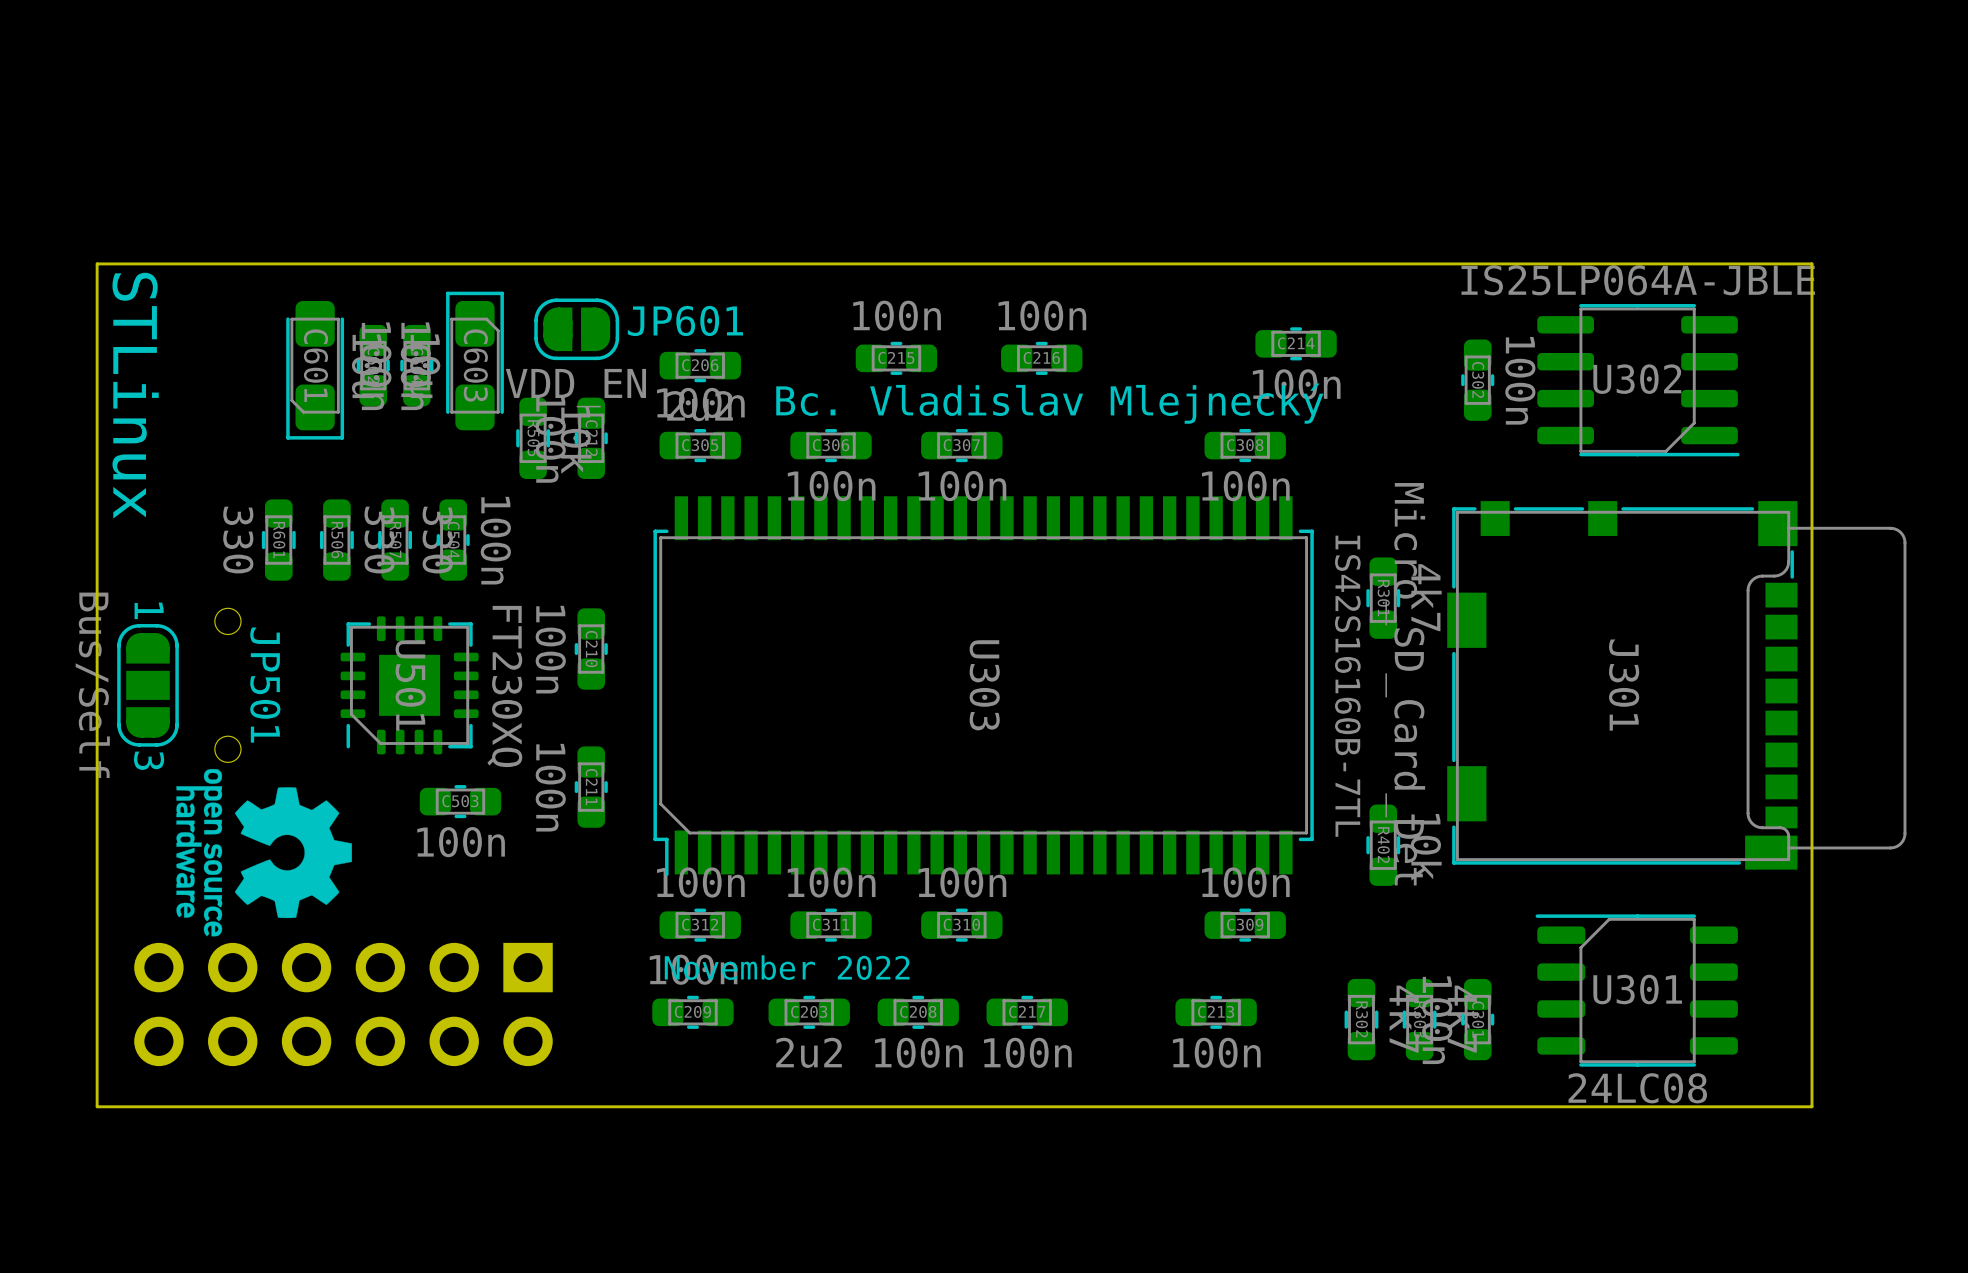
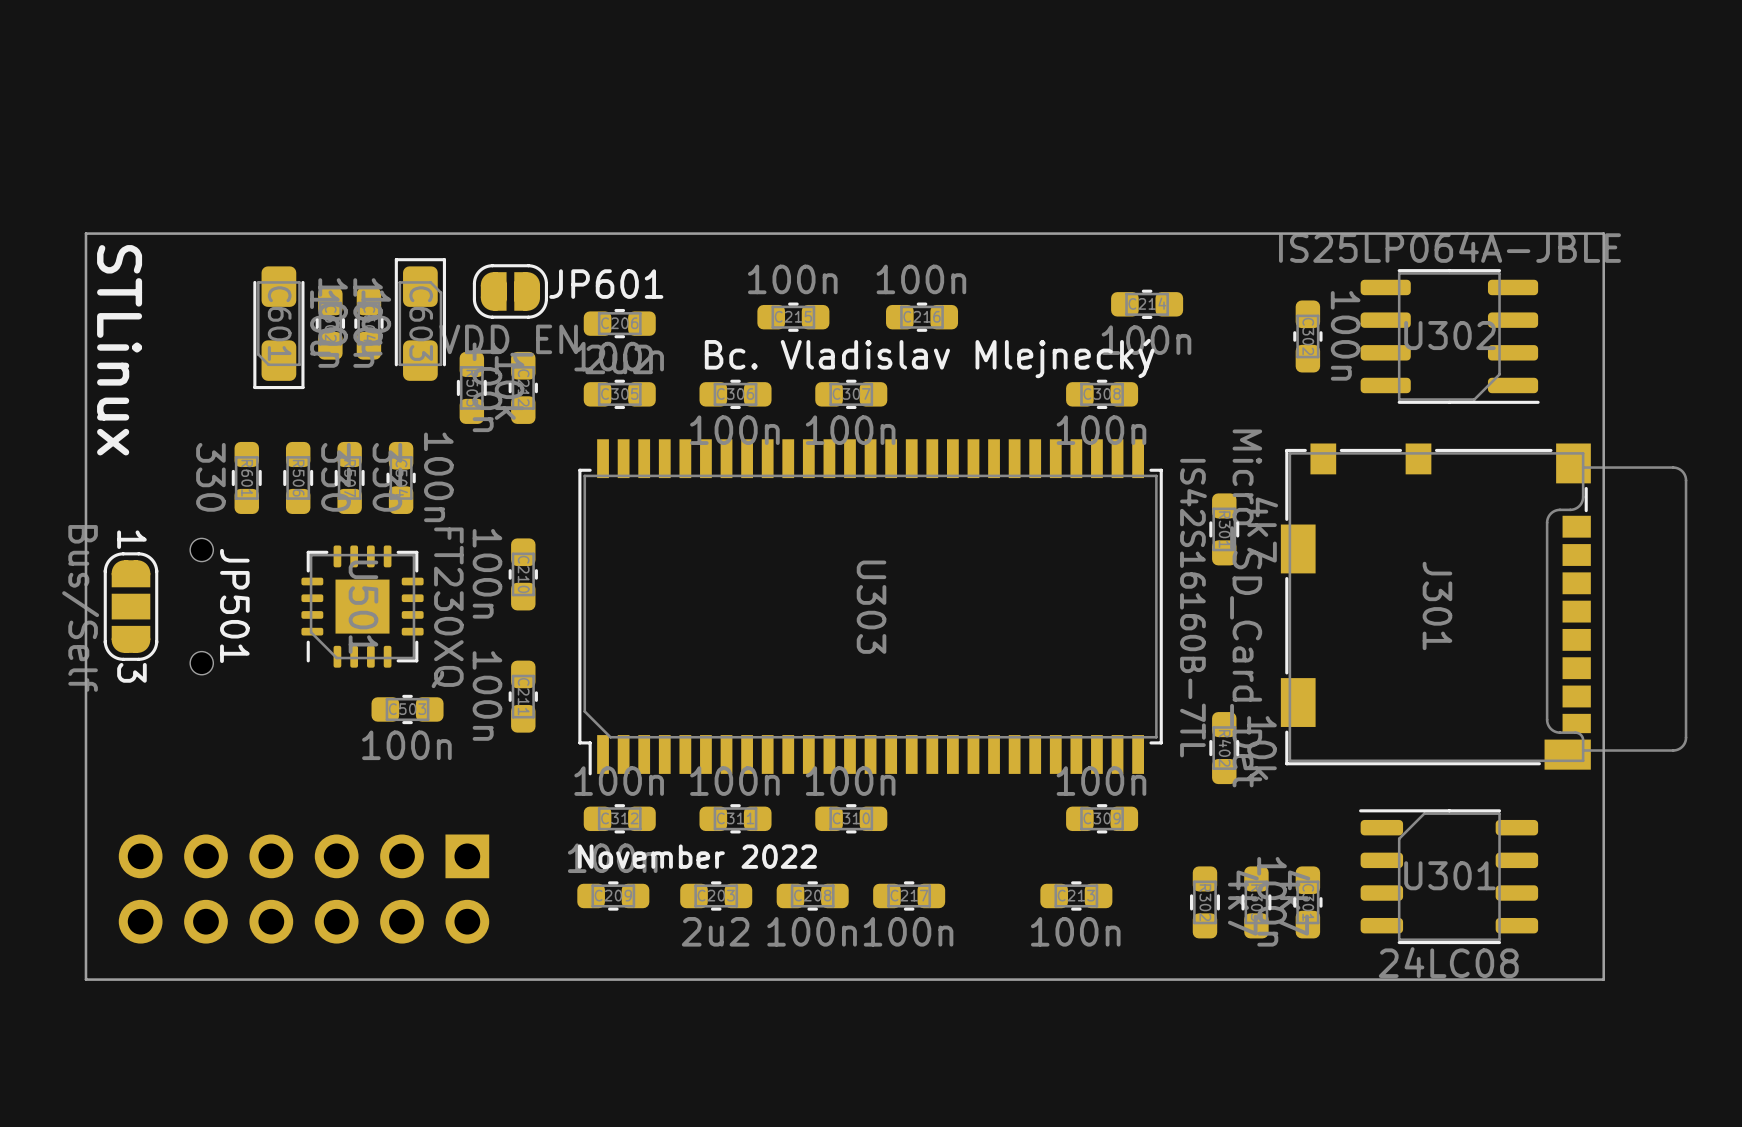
drawing: [176, 769, 352, 937] -> none

